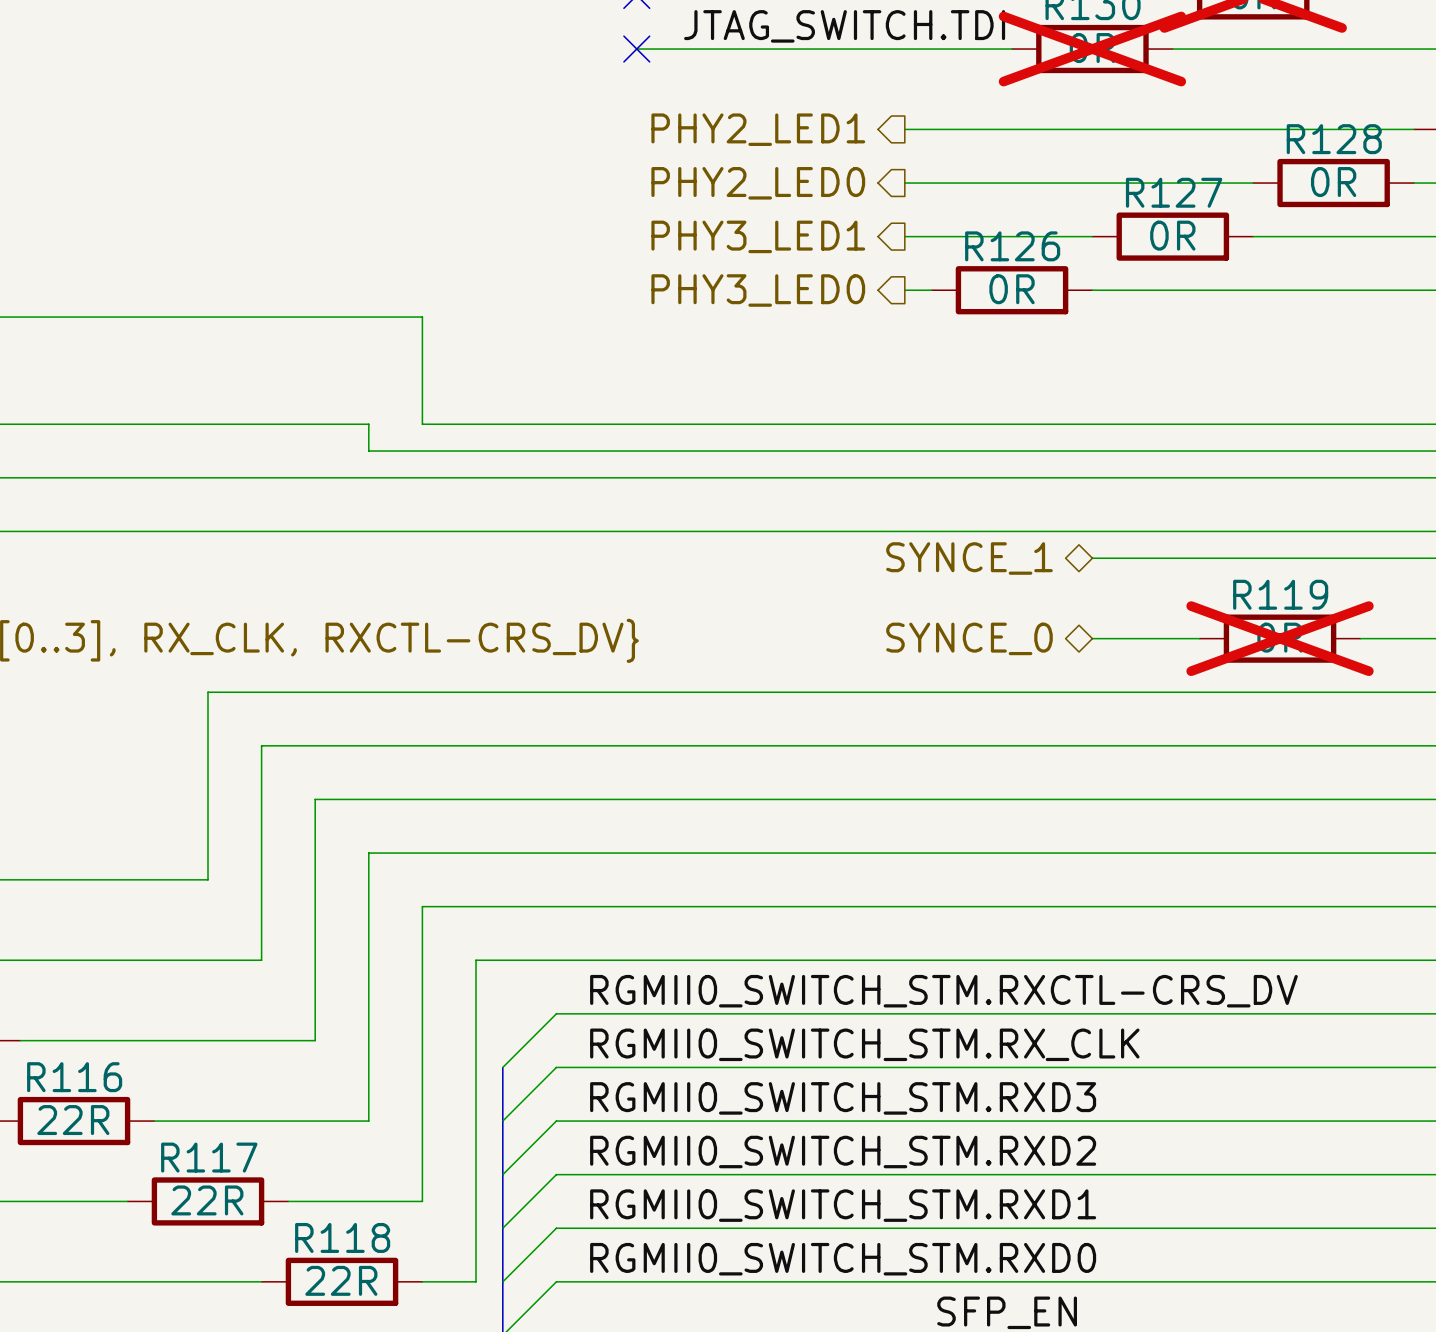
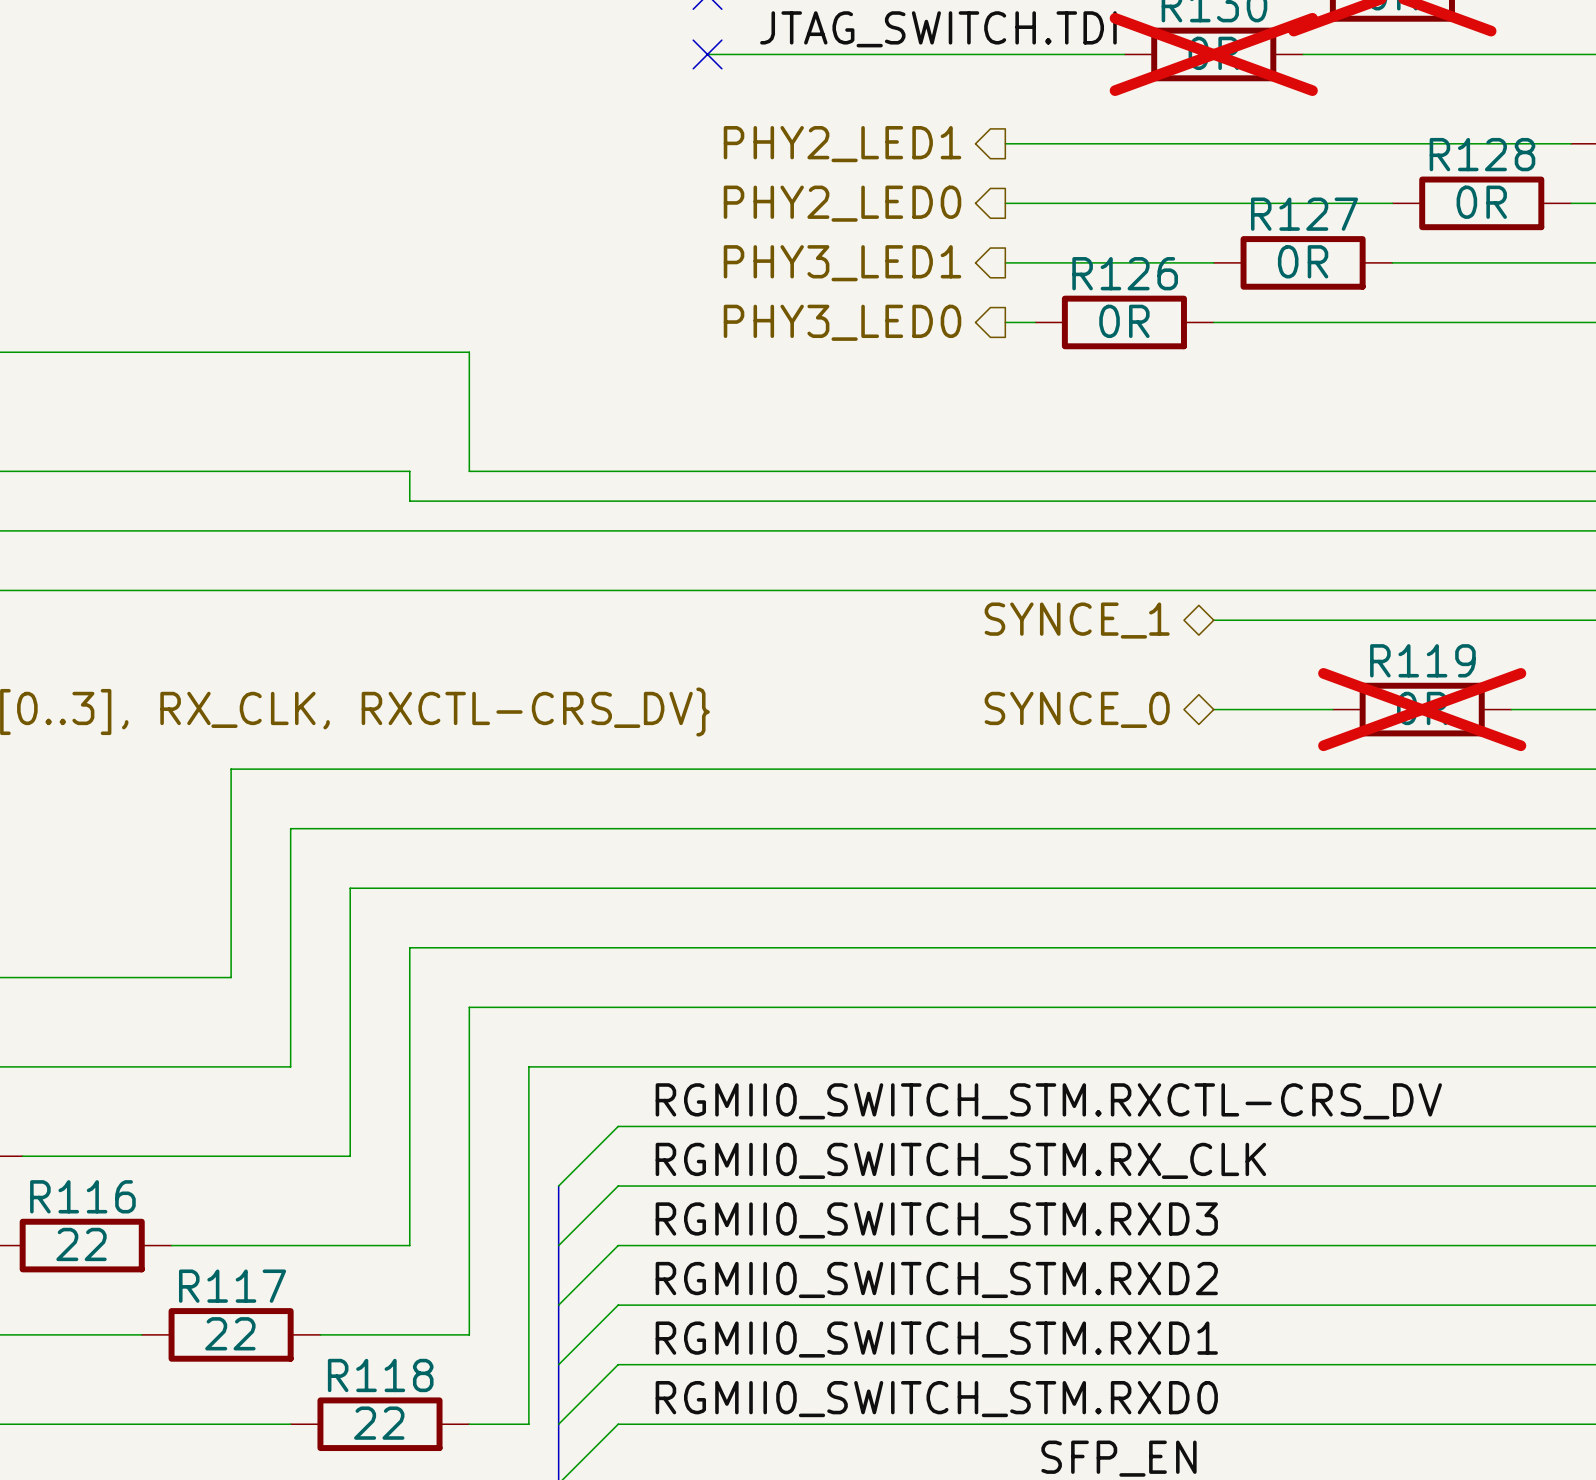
R116 value: 22R (73, 1120) -> 22 (81, 1244)
R117 value: 22R (207, 1200) -> 22 (230, 1333)
R118 value: 22R (341, 1280) -> 22 (379, 1423)

